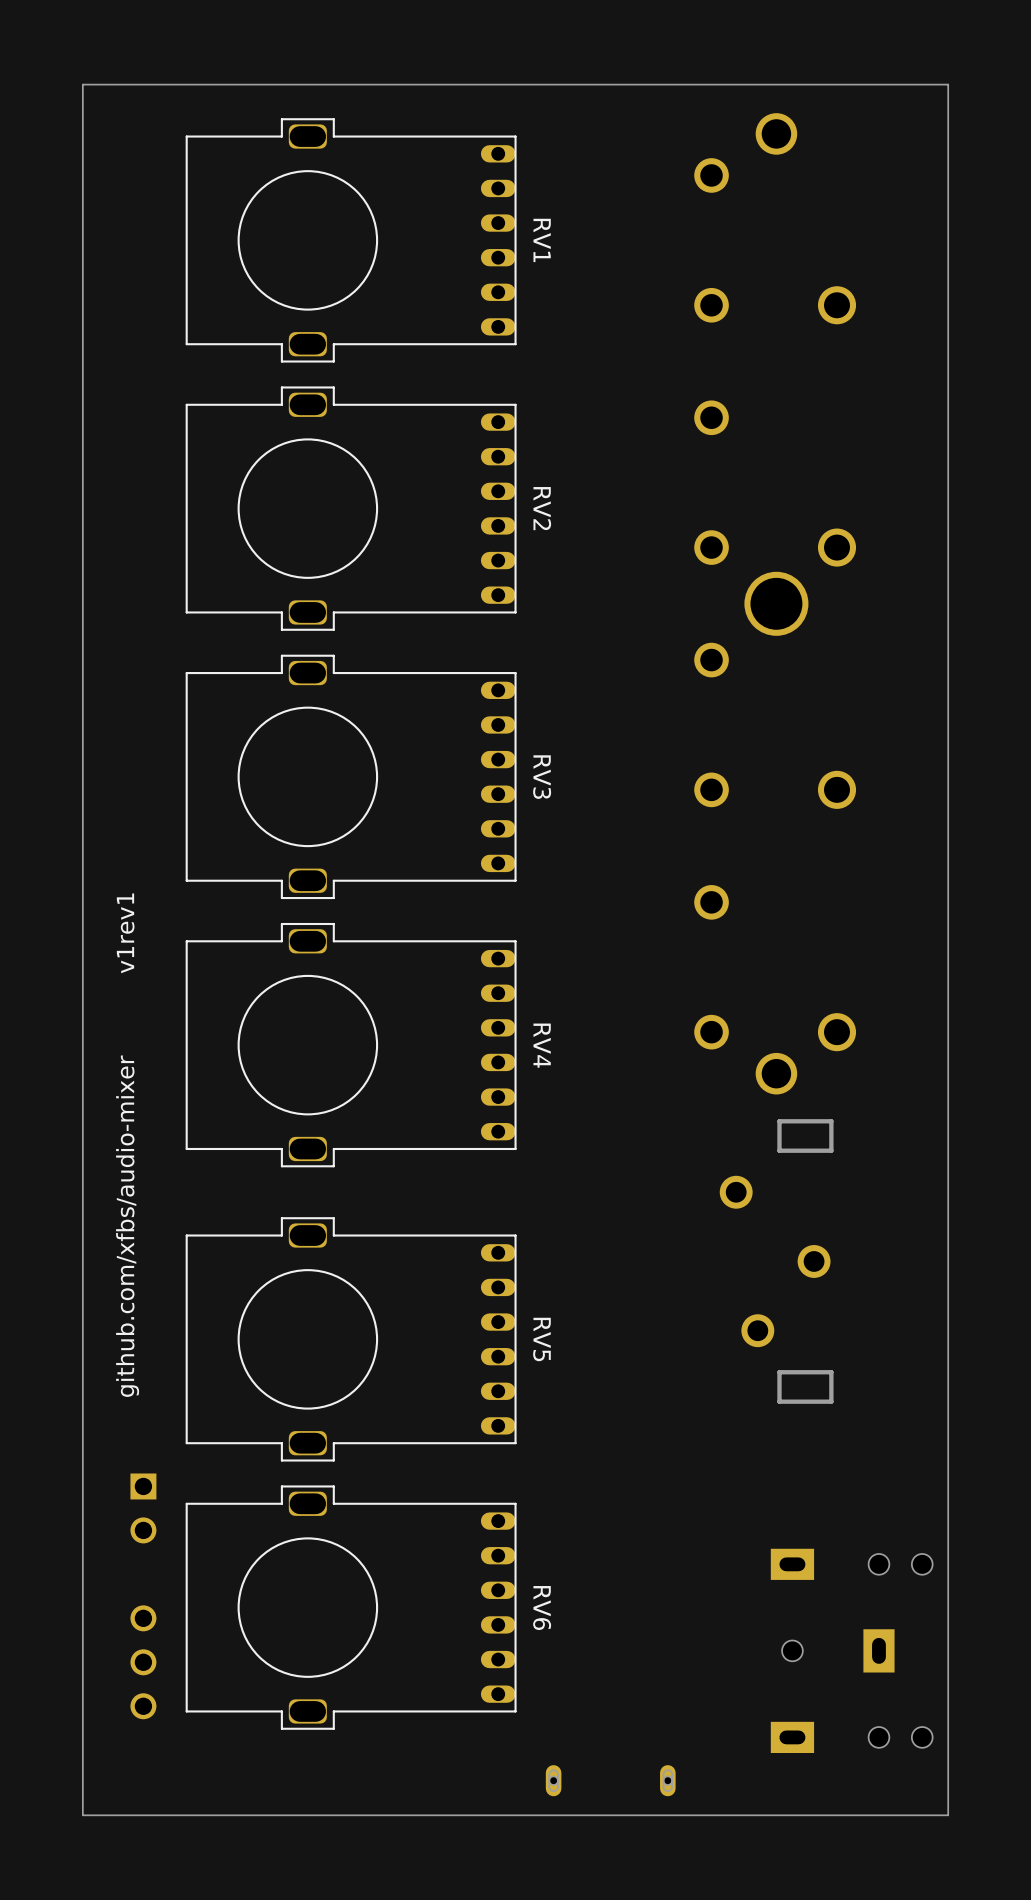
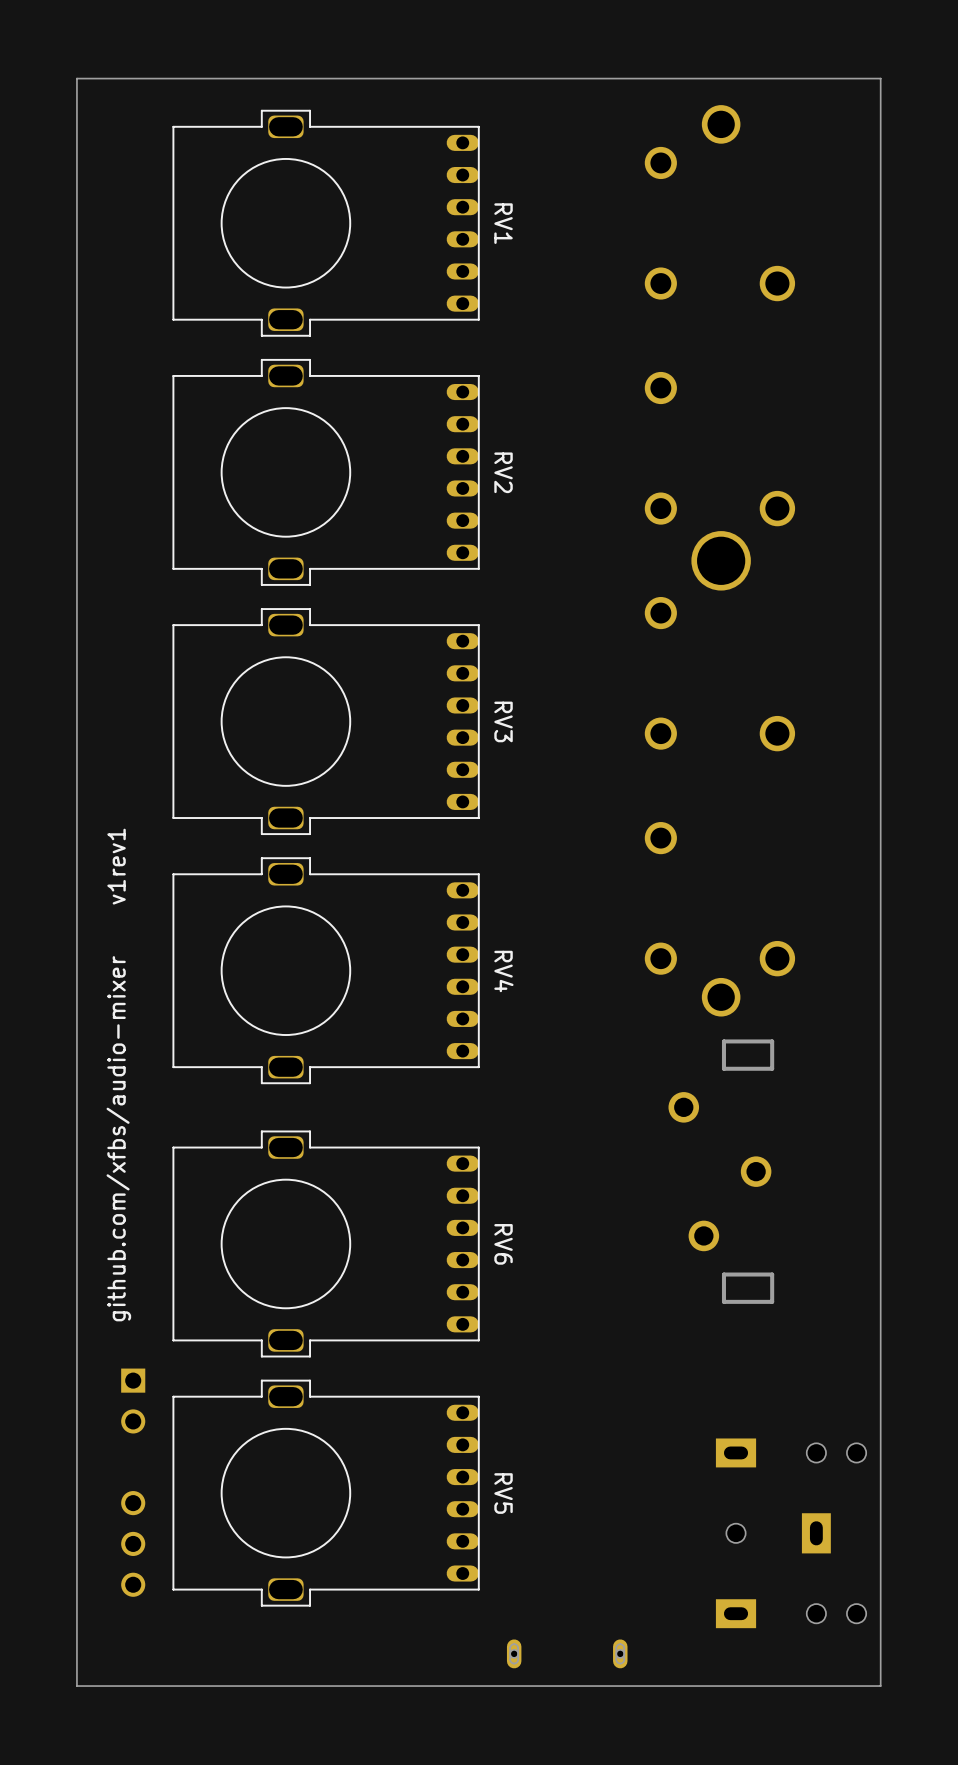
RV5 name: RV5 (541, 1339) -> RV6 (503, 1244)
RV6 name: RV6 (542, 1608) -> RV5 (503, 1493)

